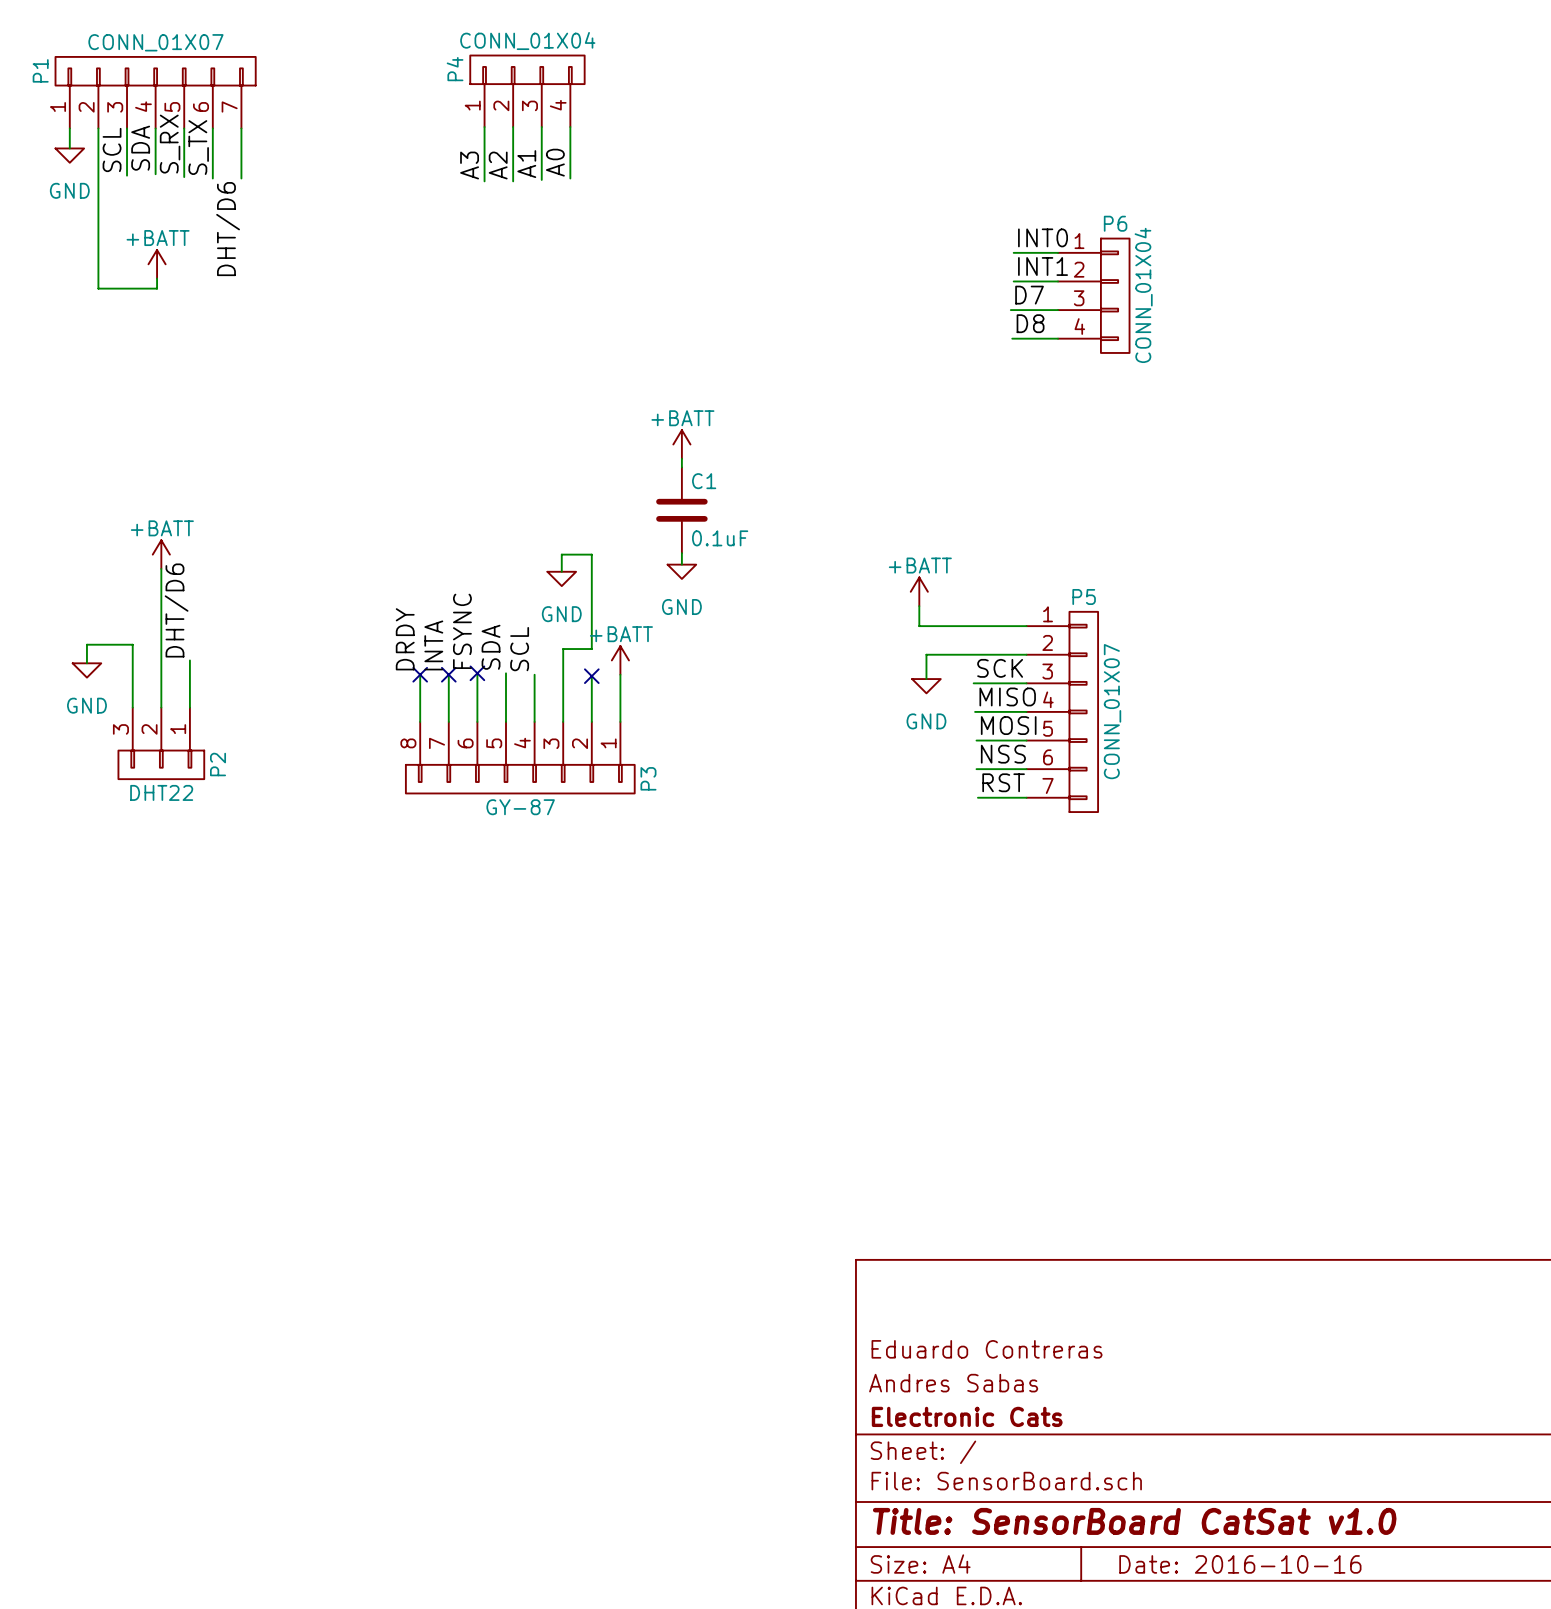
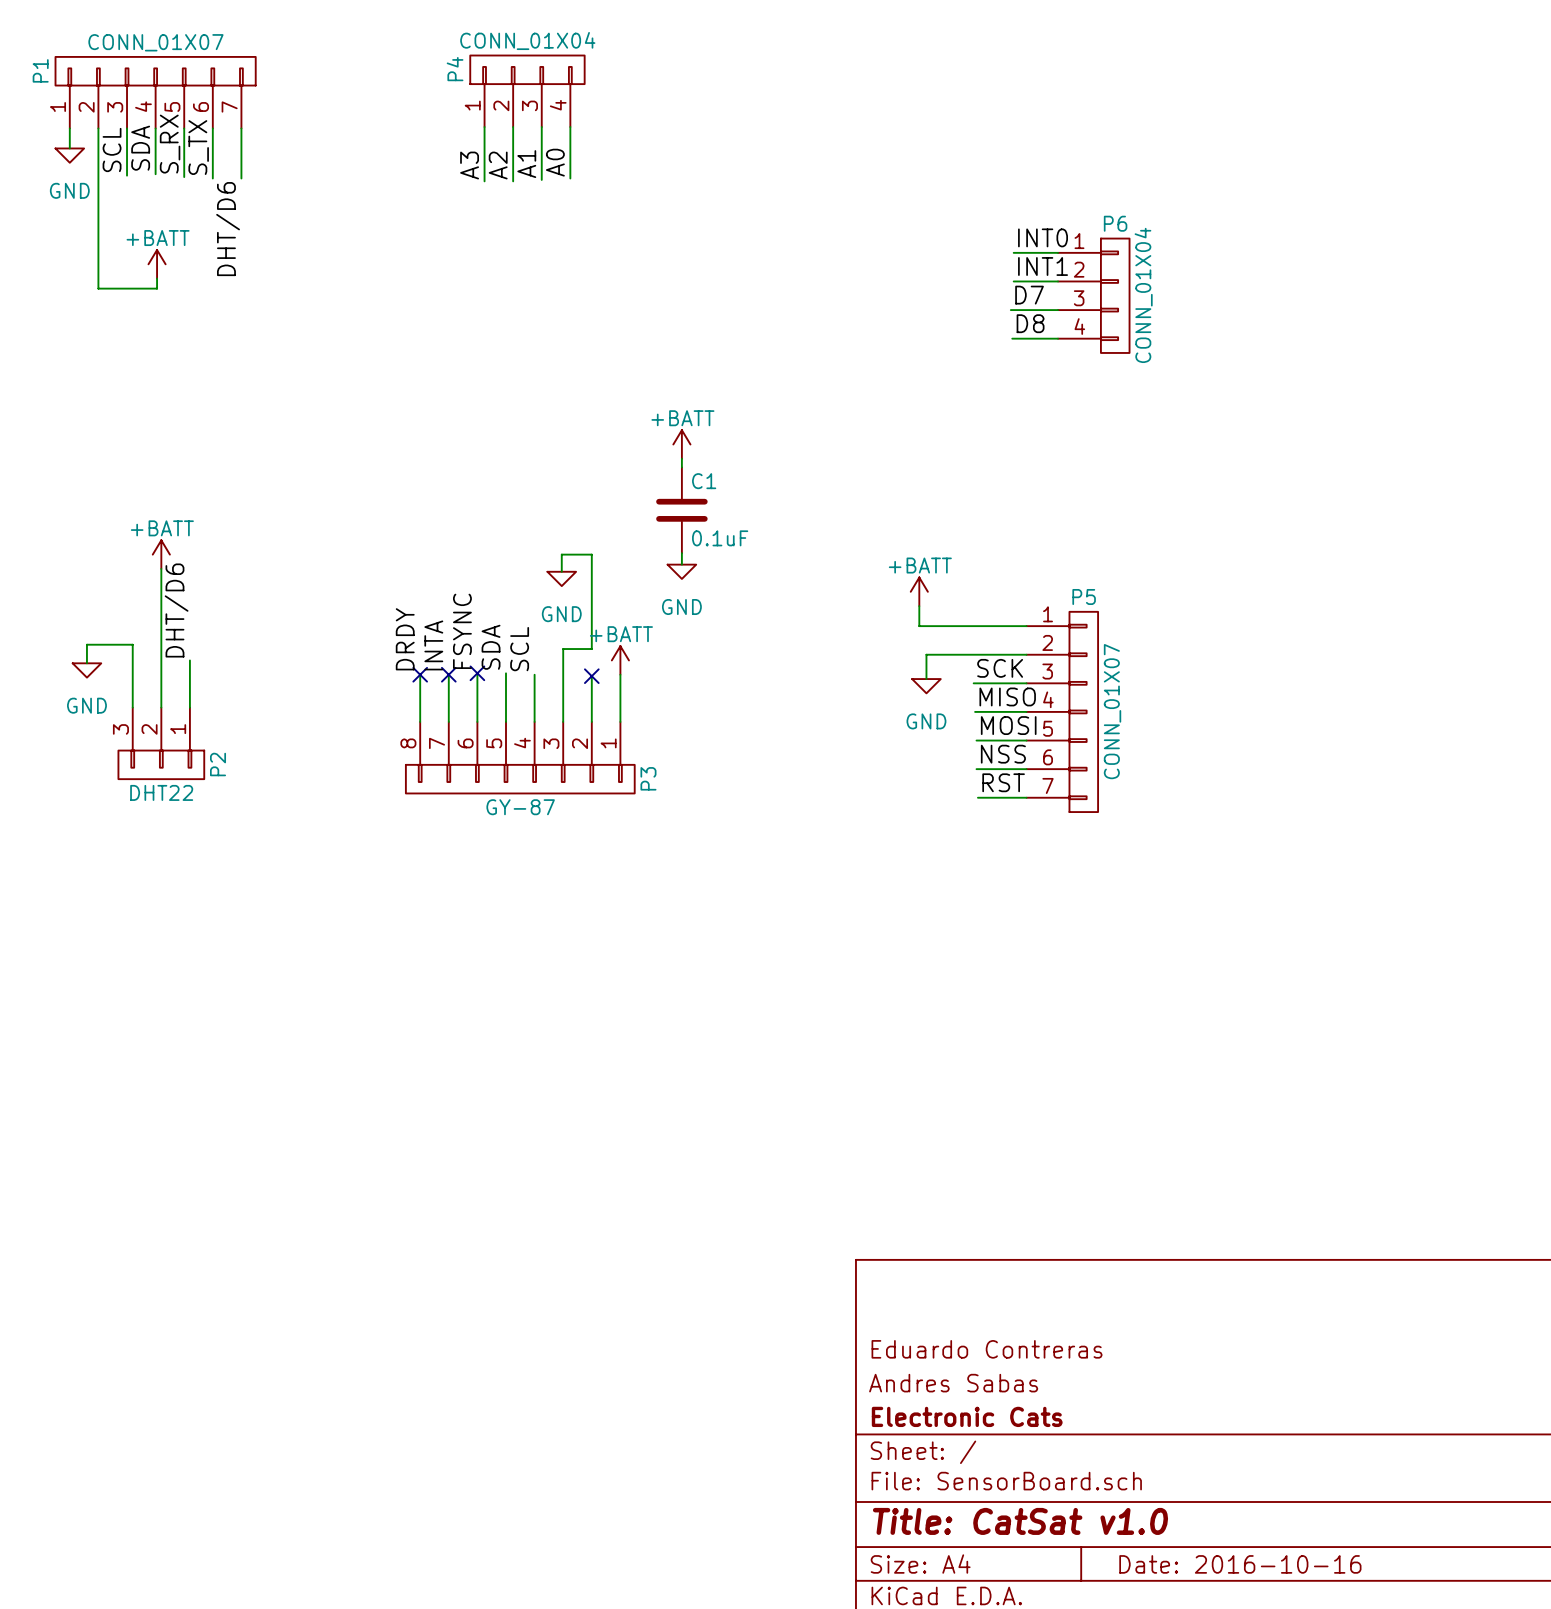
title block: Title: SensorBoard CatSat v1.0 (1134, 1521) -> Title: CatSat v1.0 (1020, 1521)

